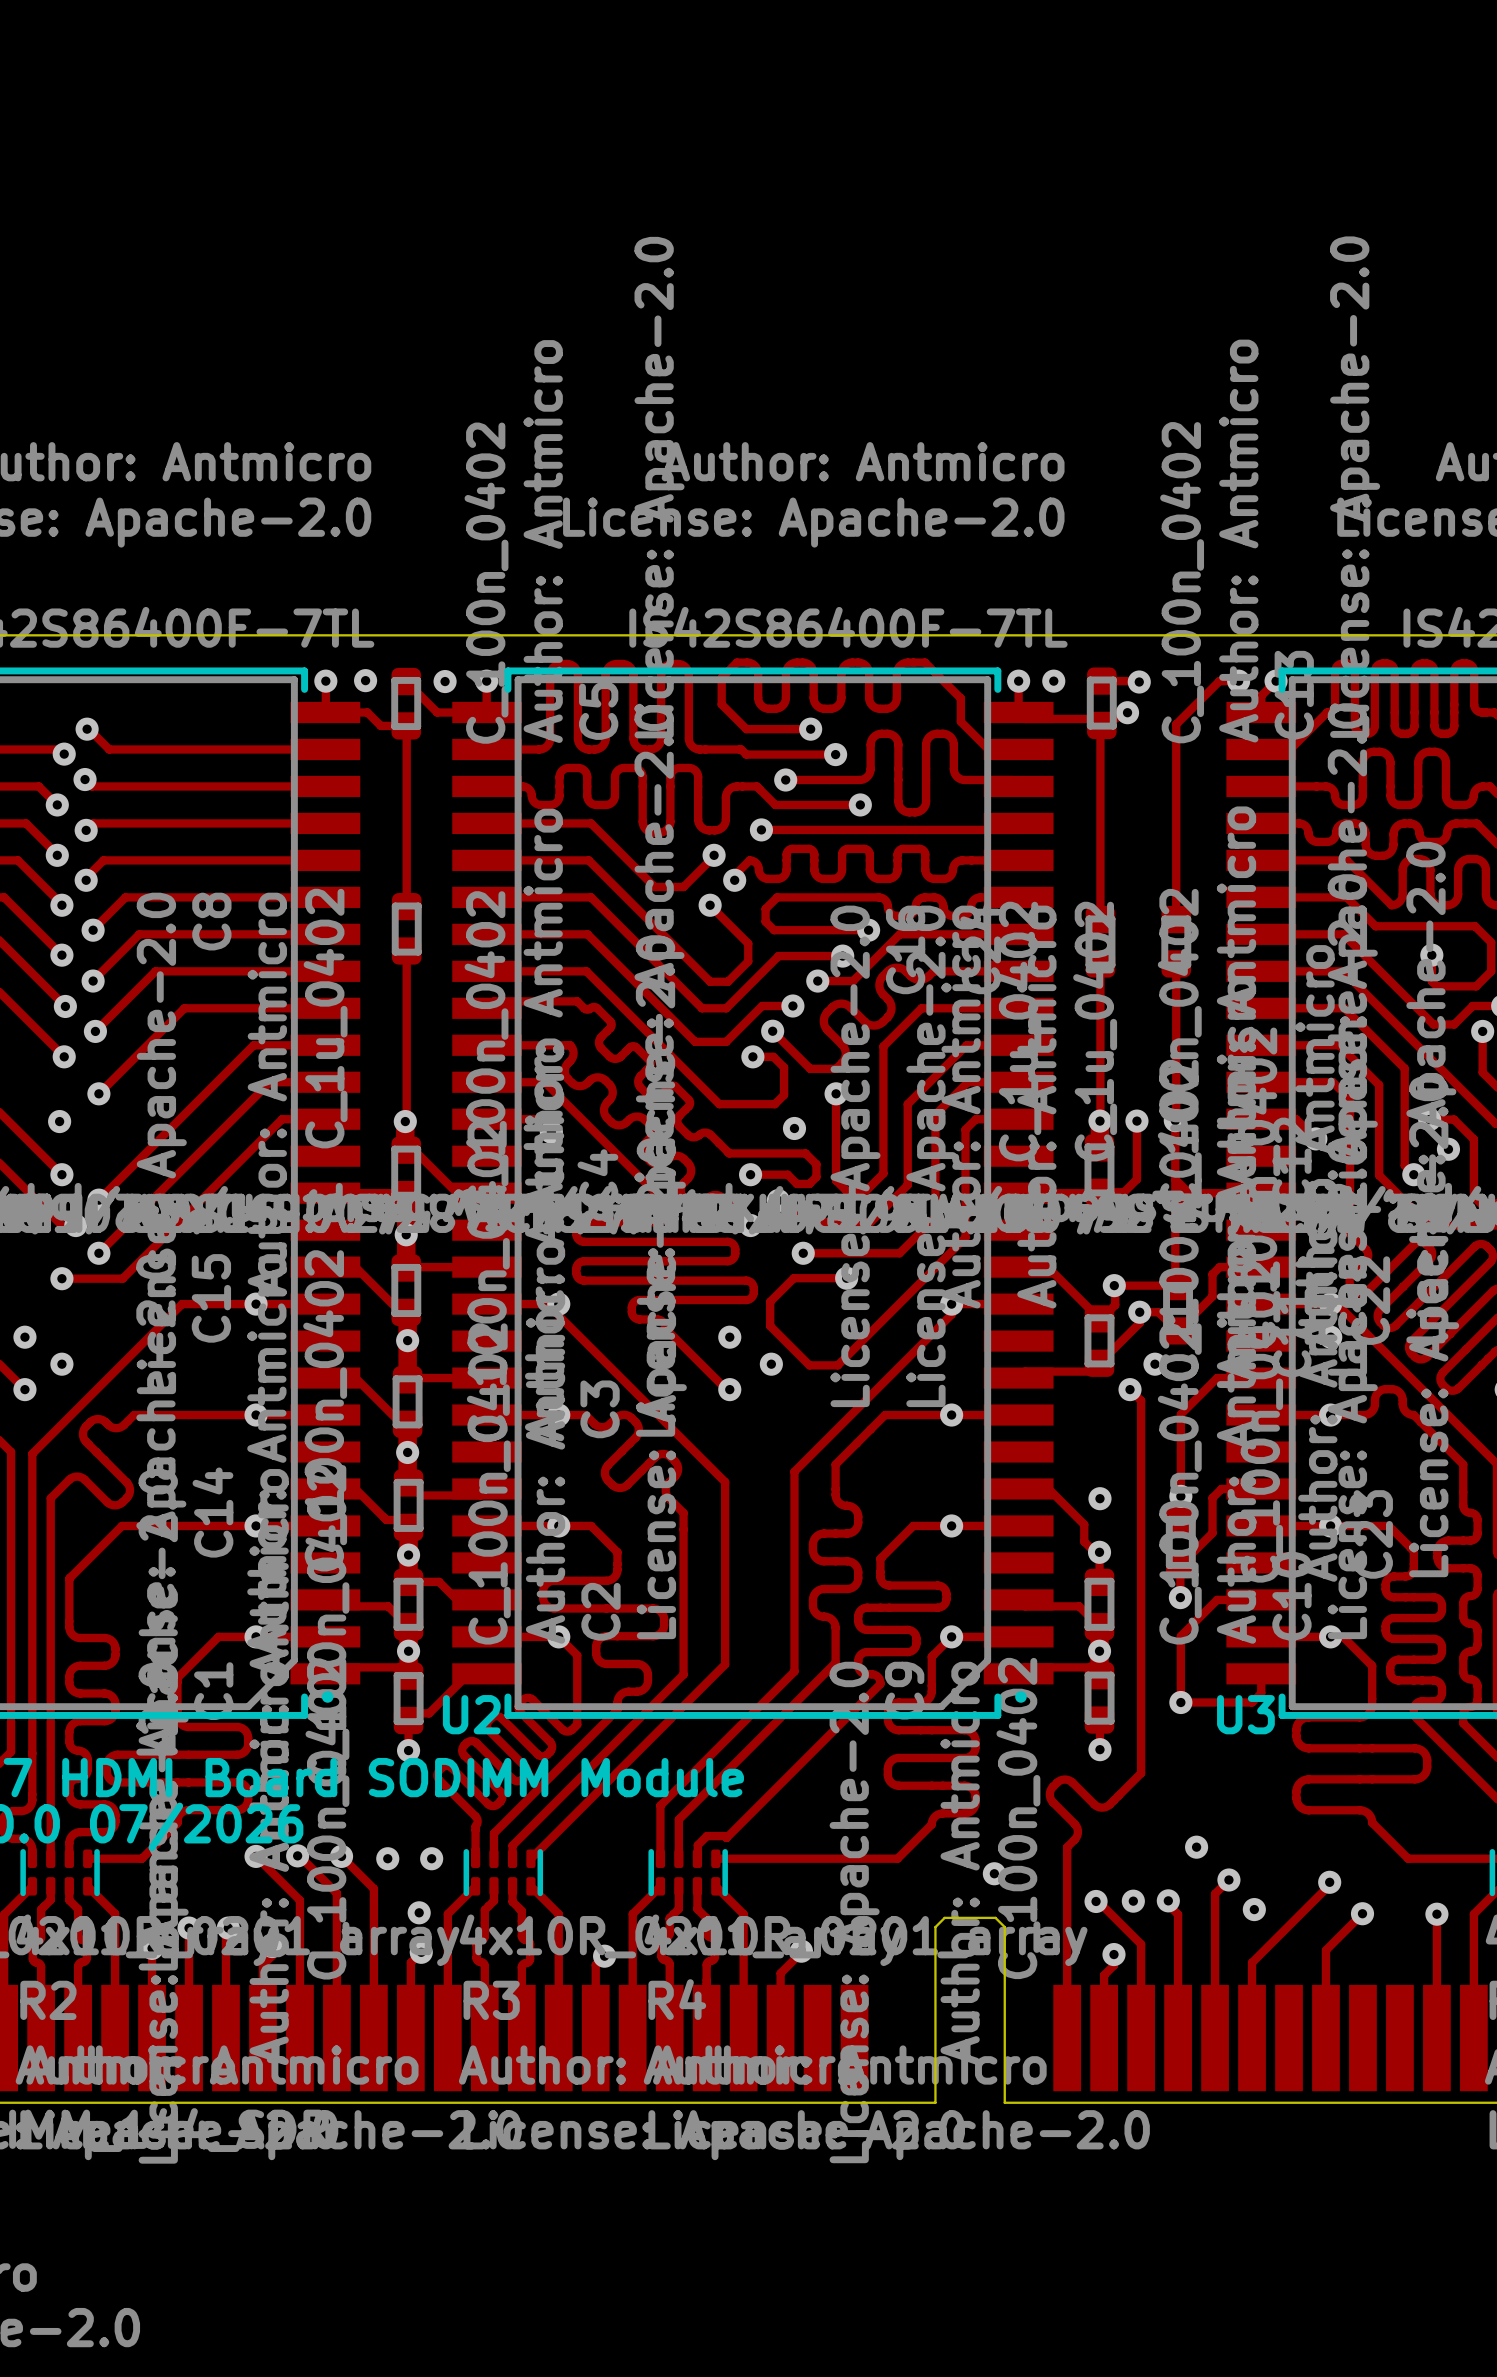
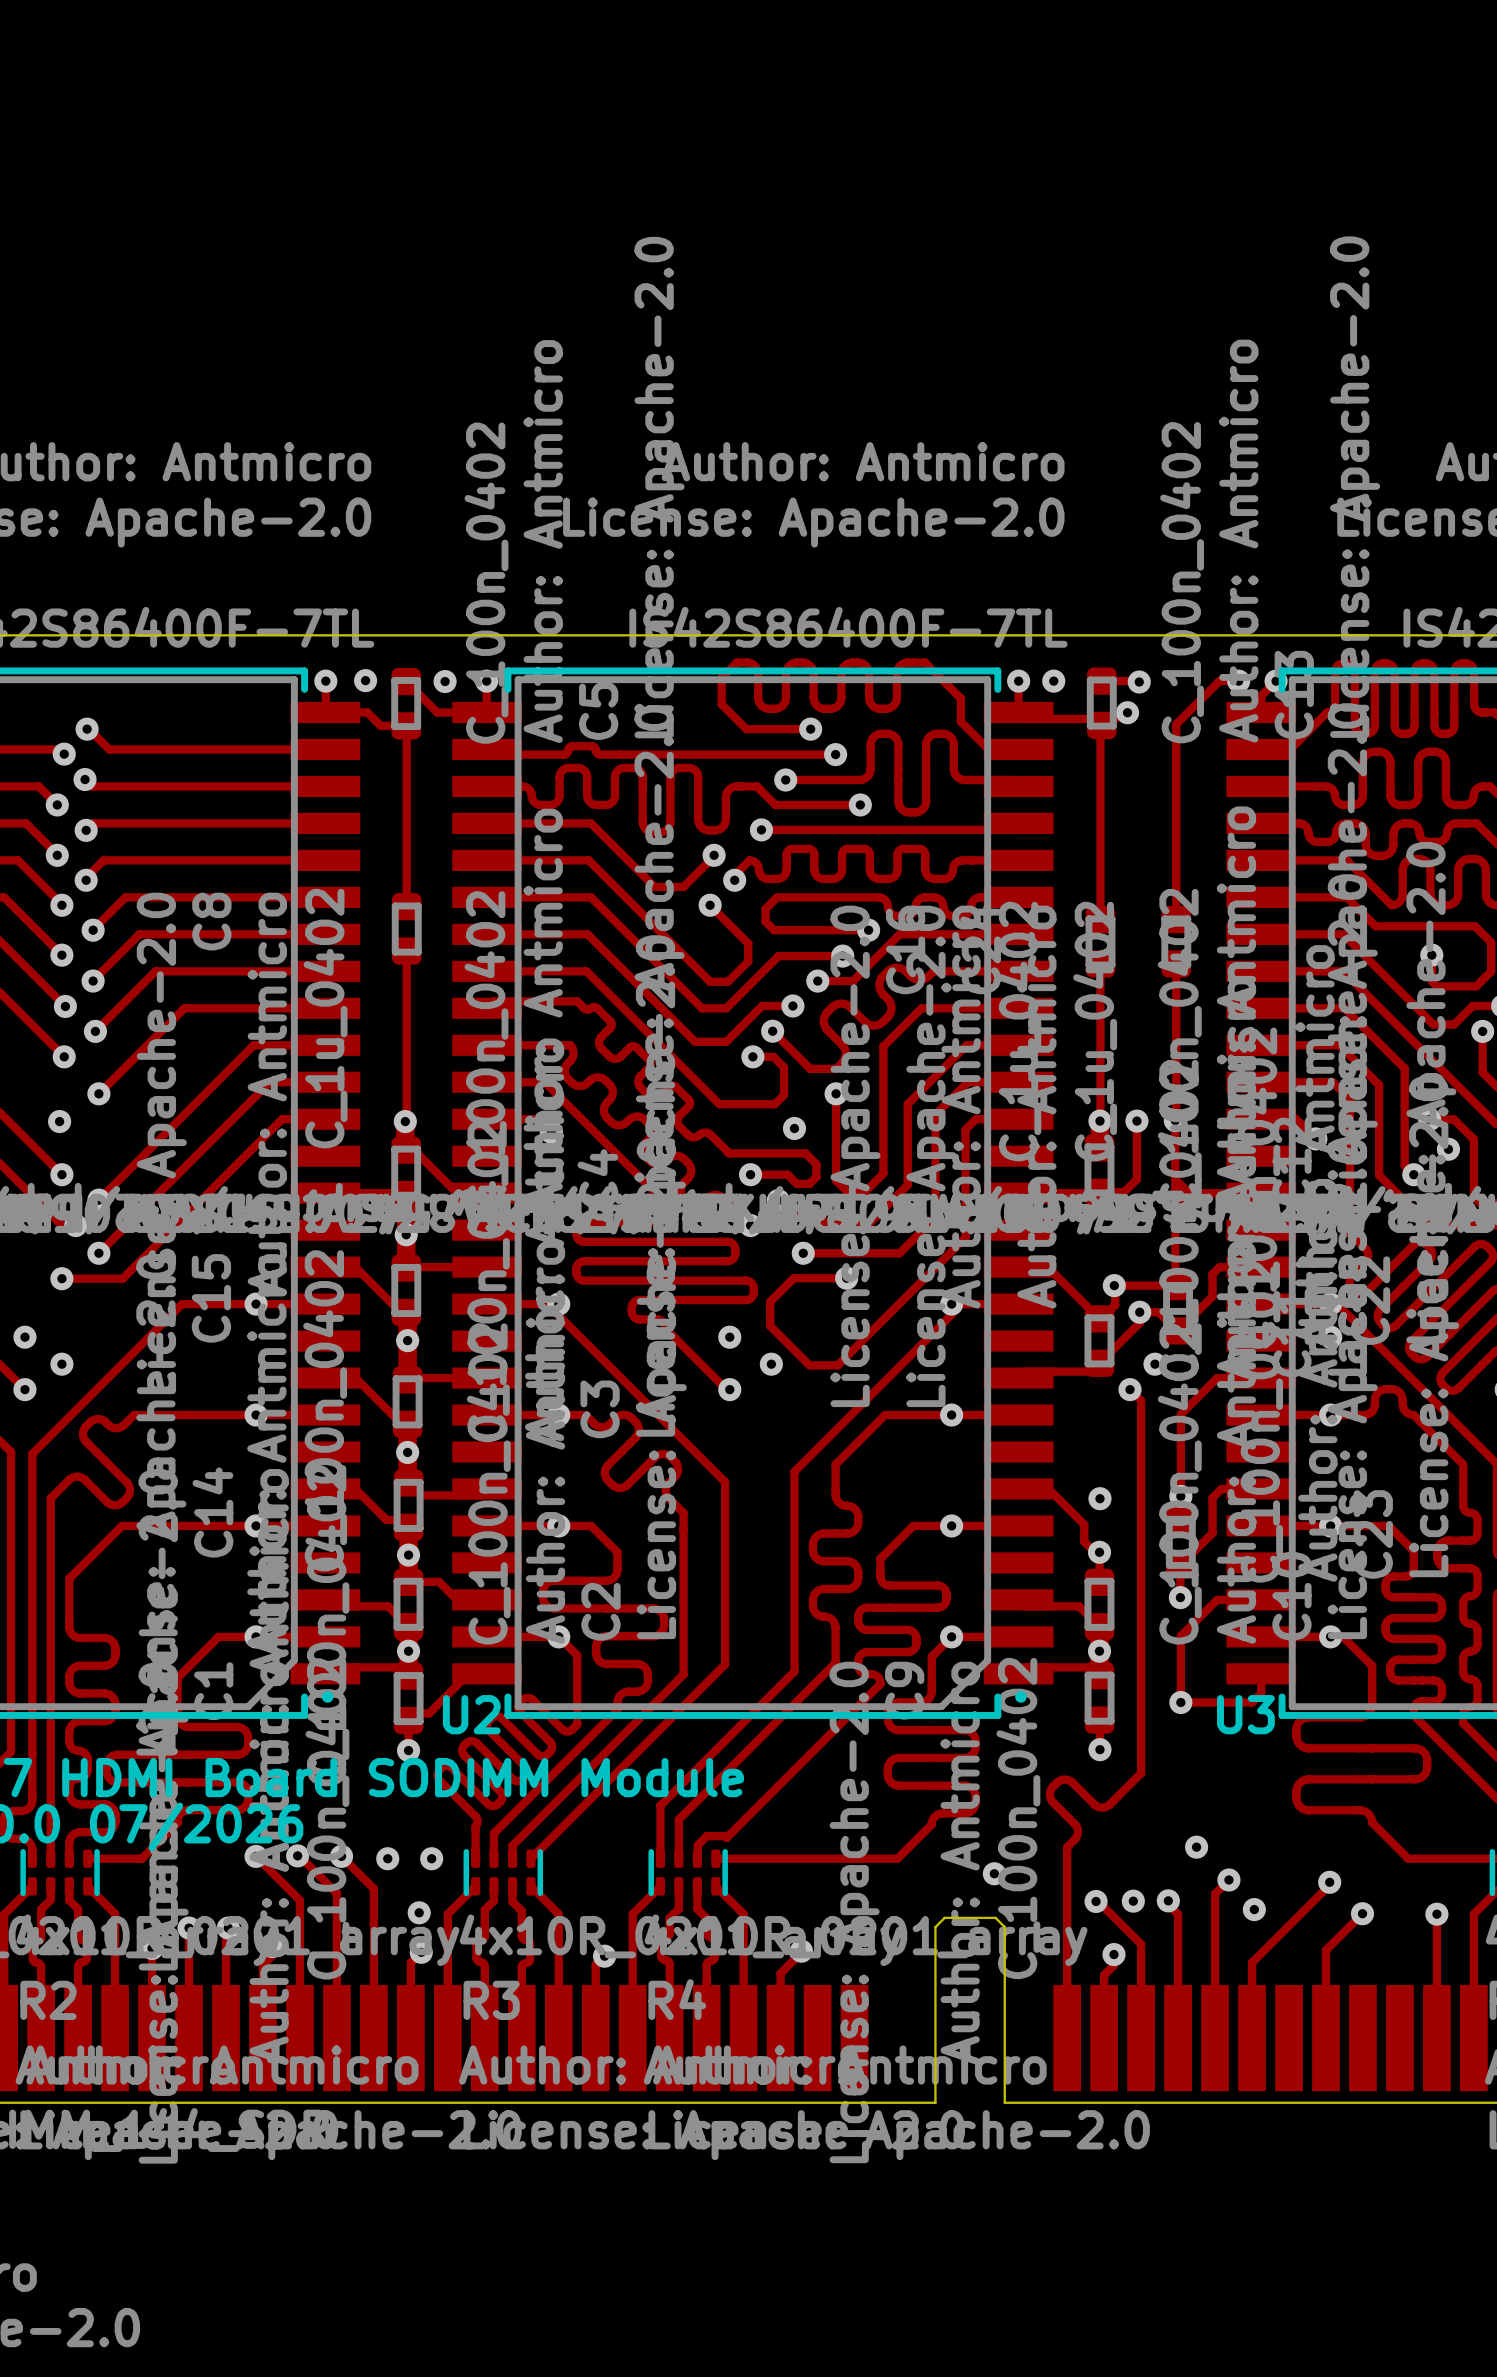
track: (487, 749) (540, 749) (547, 745) (550, 738) (550, 673) (553, 667) (561, 663) (571, 665) (577, 672) (577, 738) (581, 746) (586, 749) (595, 749) (604, 743) (605, 672) (611, 665) (622, 663) (629, 666) (633, 673) (634, 742) (640, 748) (654, 748) (661, 739) (661, 672) (667, 665) (677, 663) (684, 666) (688, 673) (688, 738) (691, 745) (698, 749) (741, 749) (746, 754) -> (487, 749) (492, 754) (564, 754) (570, 746) (591, 746) (600, 754) (746, 754)

